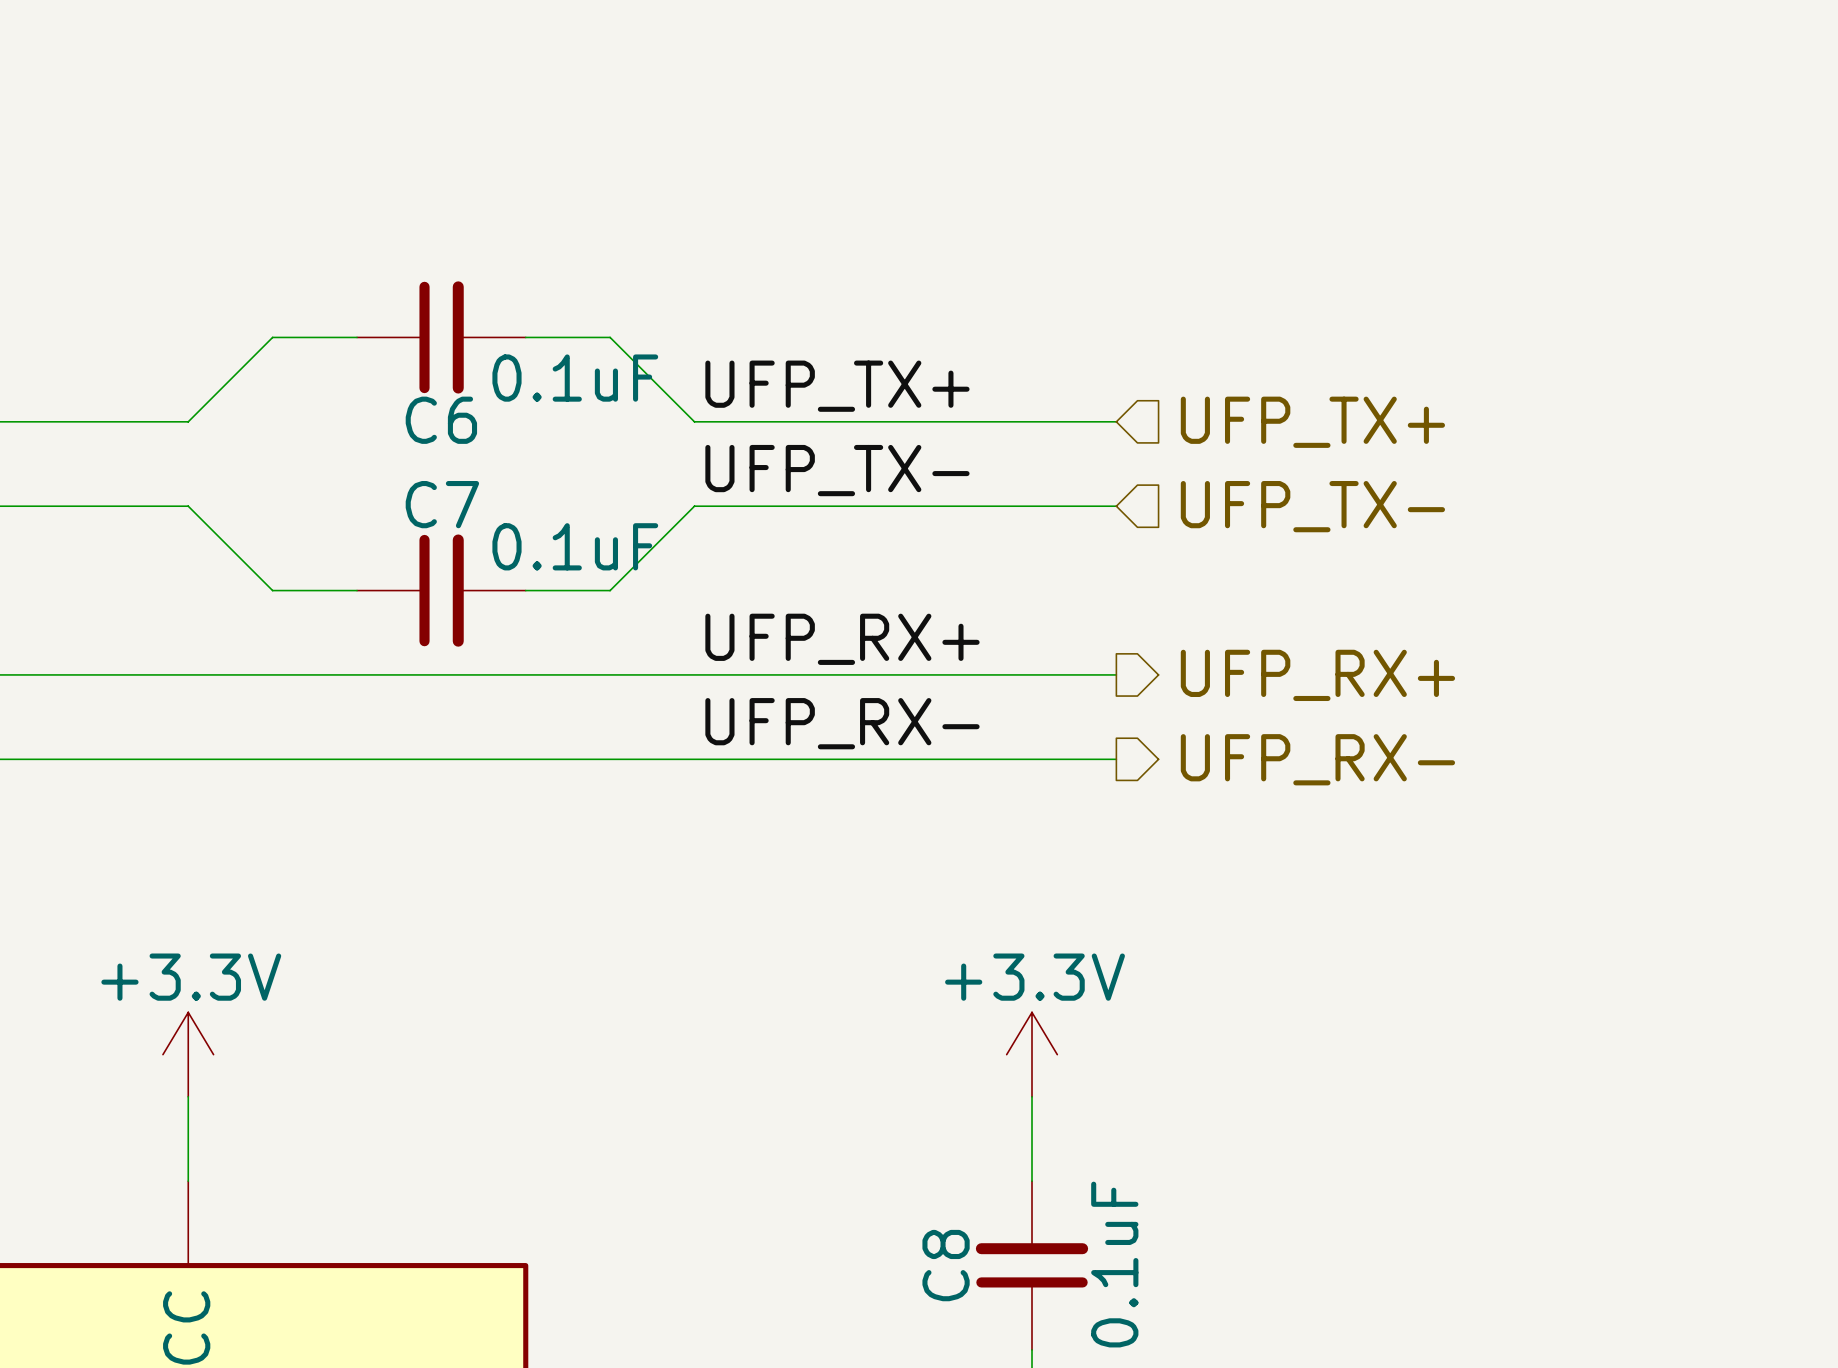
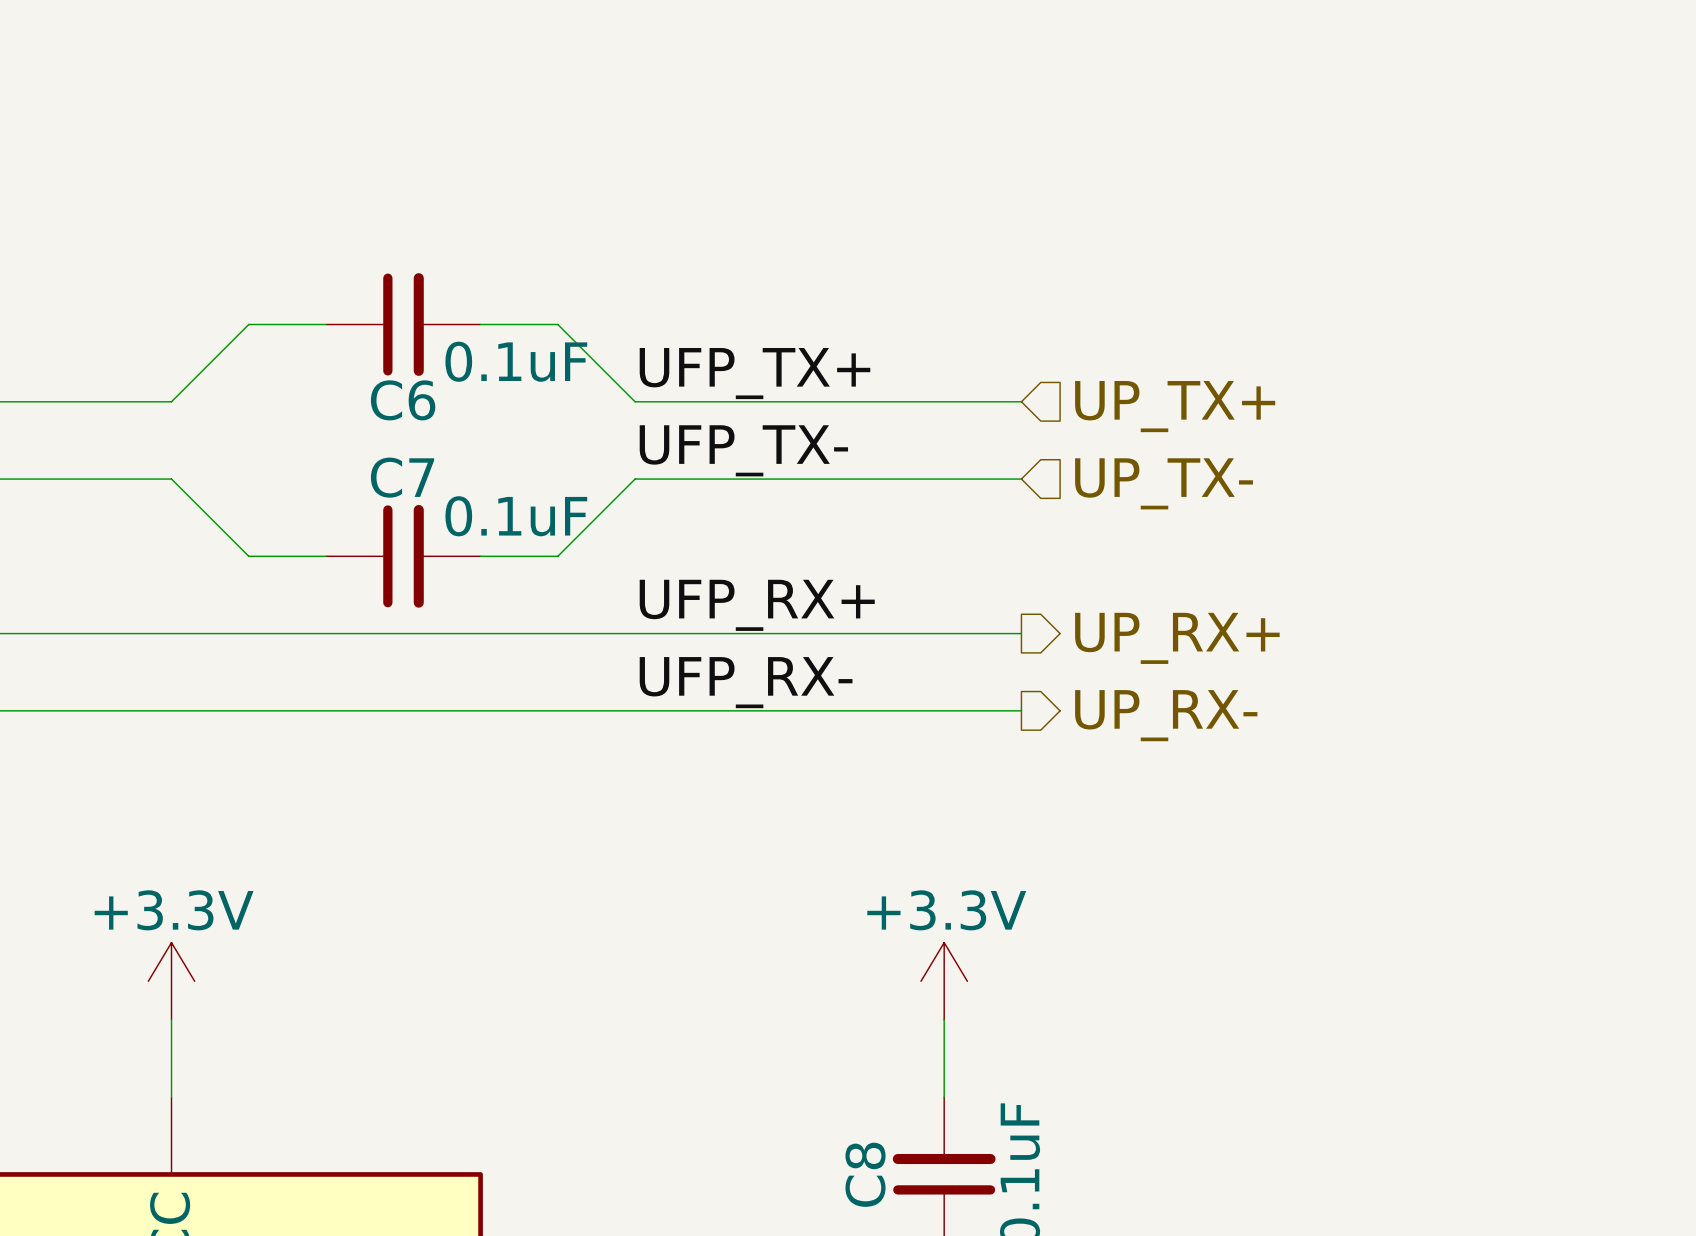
hierarchical label: UFP_TX+ (1312, 422) -> UP_TX+ (1175, 406)
hierarchical label: UFP_TX- (1312, 506) -> UP_TX- (1164, 483)
hierarchical label: UFP_RX+ (1317, 675) -> UP_RX+ (1177, 638)
hierarchical label: UFP_RX- (1317, 759) -> UP_RX- (1166, 715)

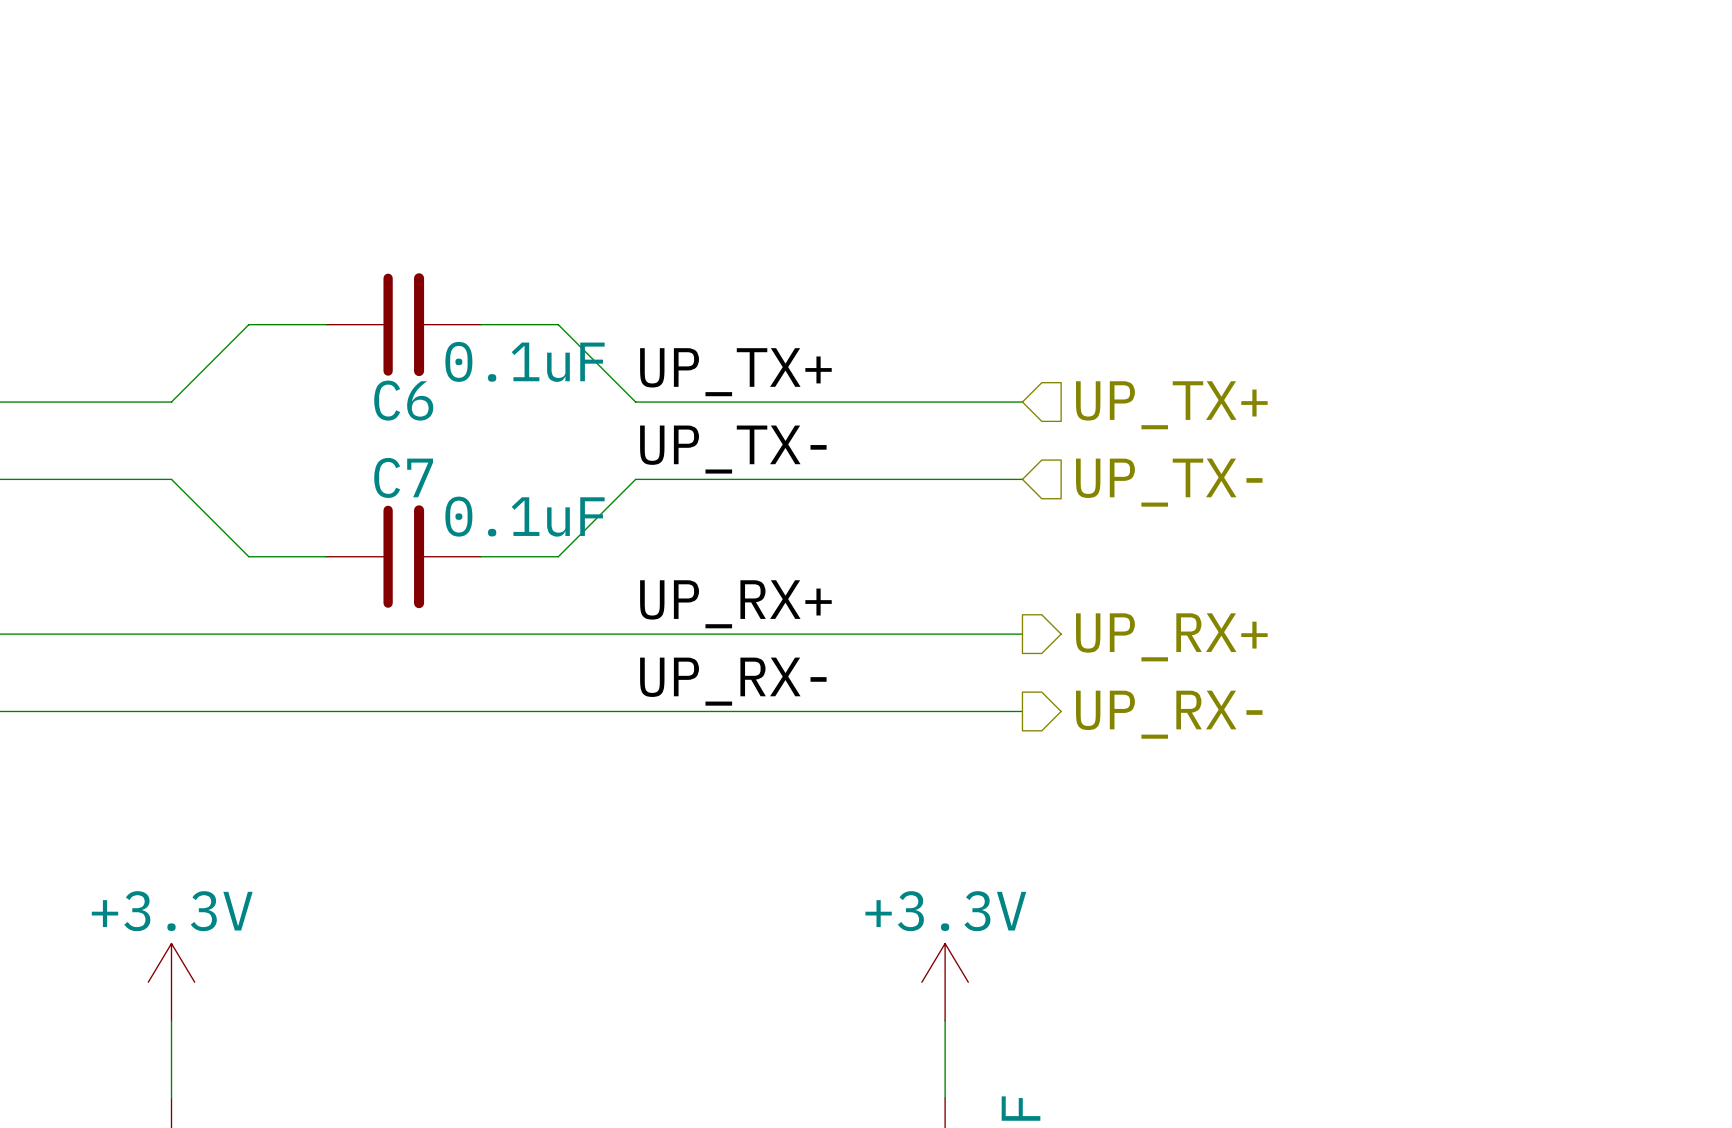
label: UFP_TX+ (754, 373) -> UP_TX+ (735, 372)
label: UFP_TX- (743, 450) -> UP_TX- (733, 449)
label: UFP_RX+ (757, 605) -> UP_RX+ (735, 604)
label: UFP_RX- (746, 682) -> UP_RX- (733, 681)

